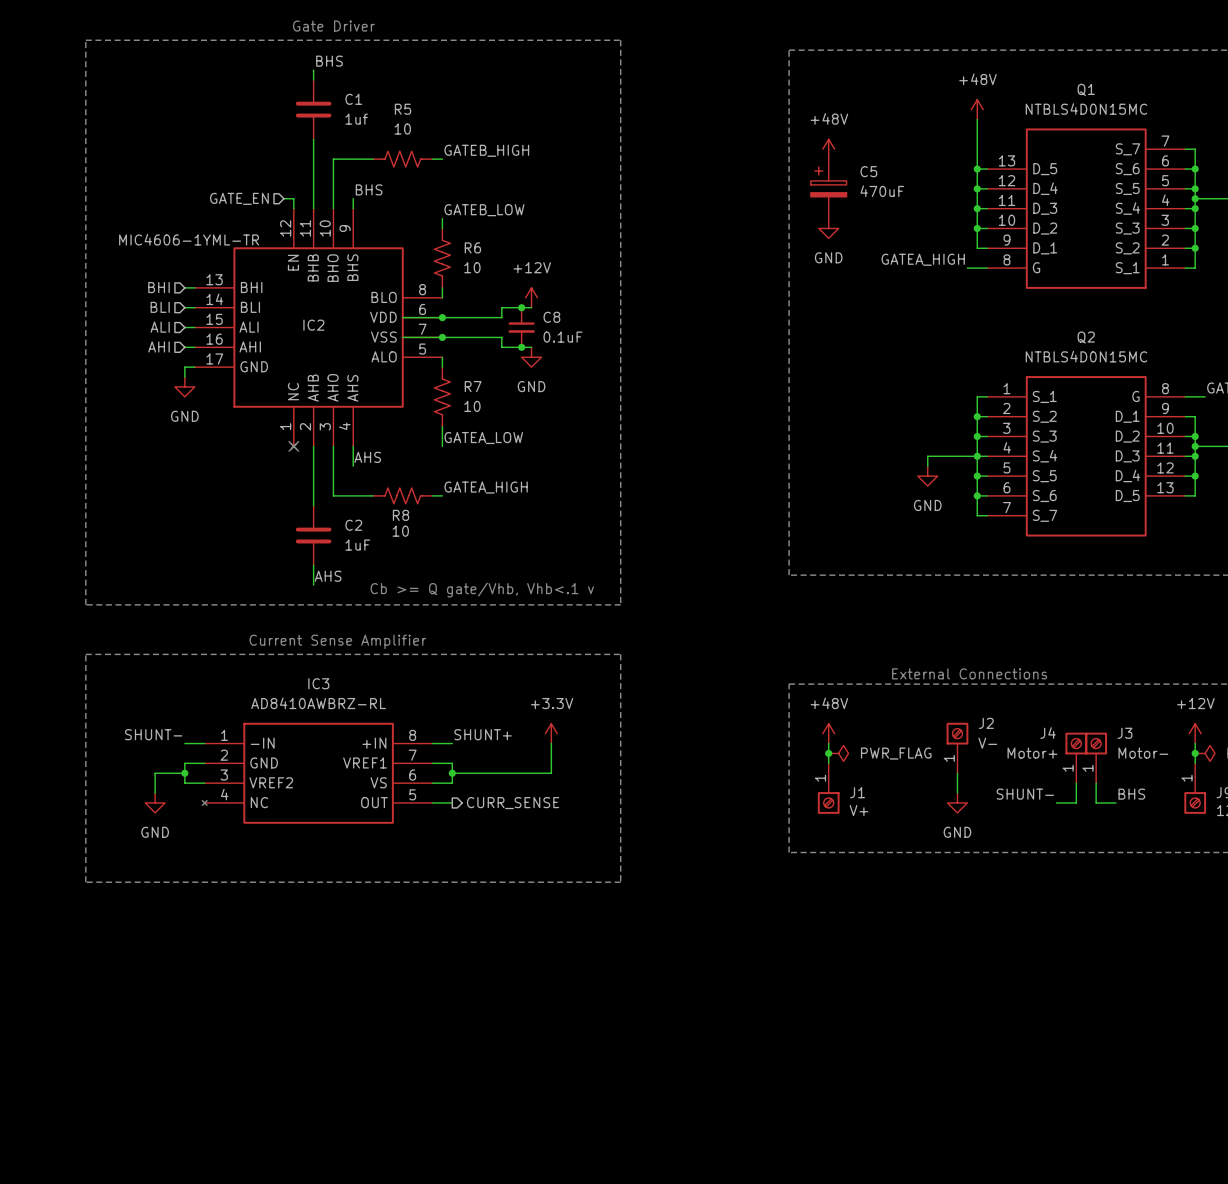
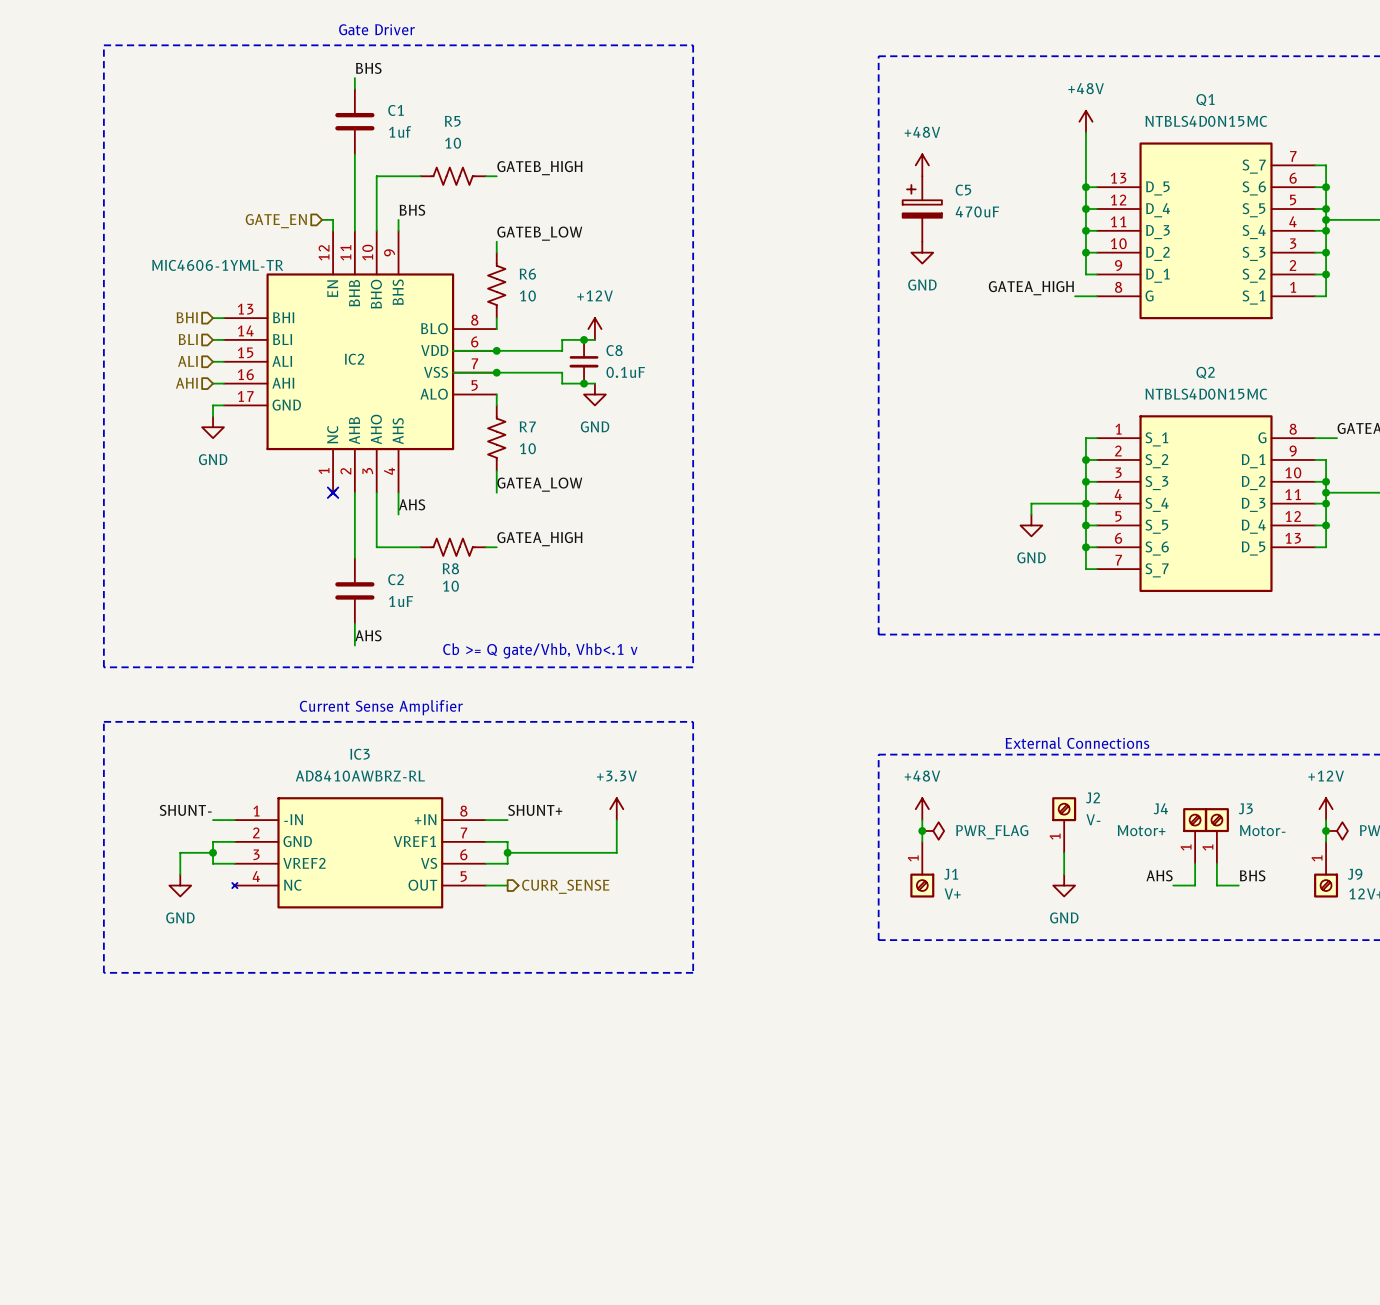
label: SHUNT- (1025, 794) -> AHS (1159, 875)

